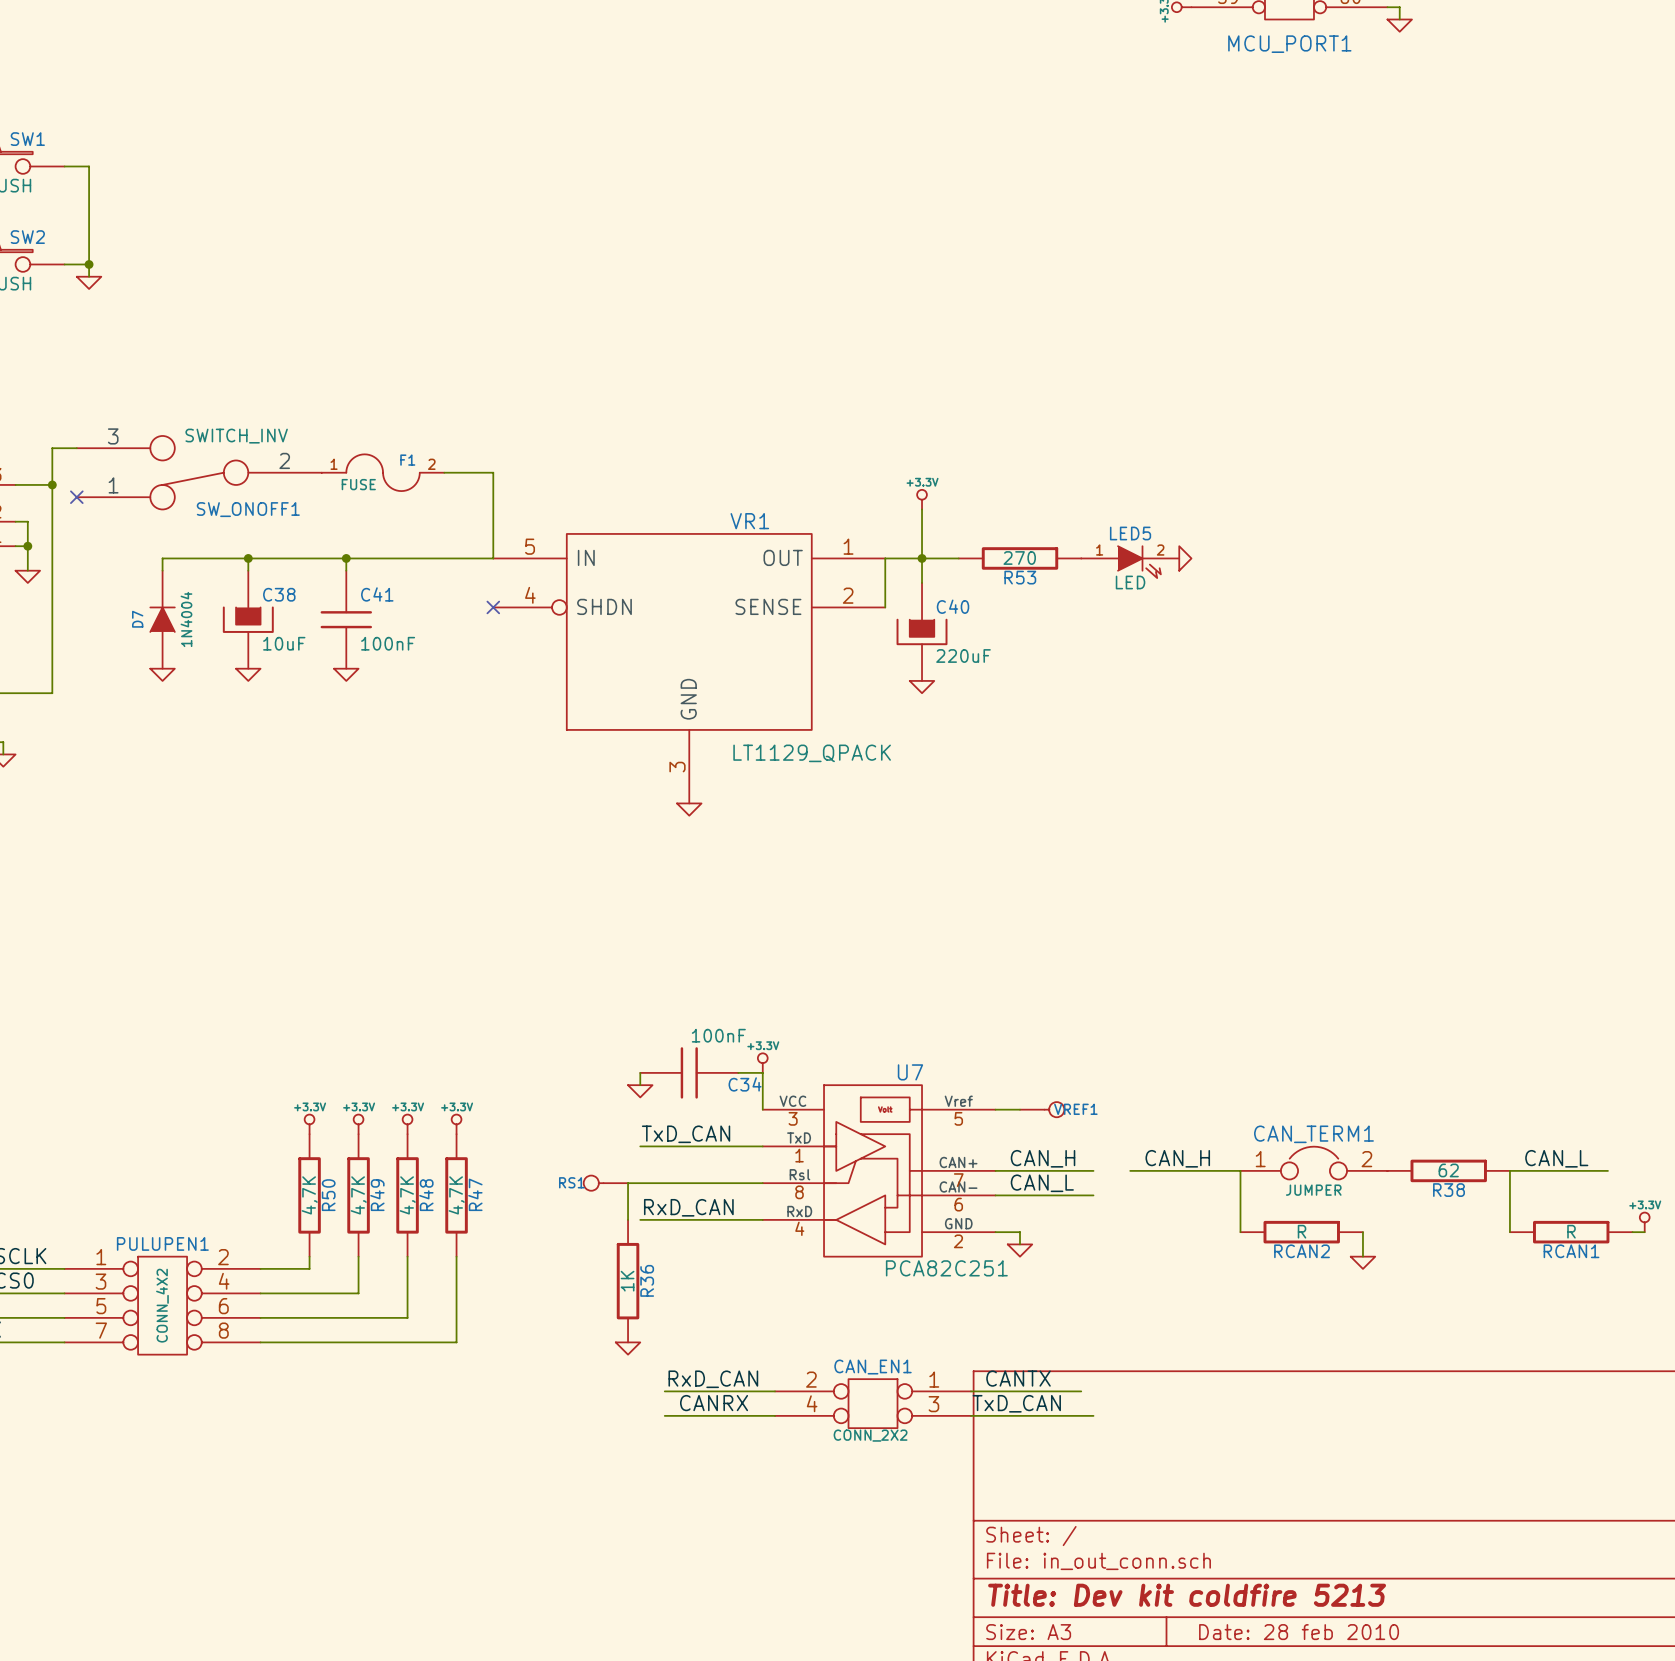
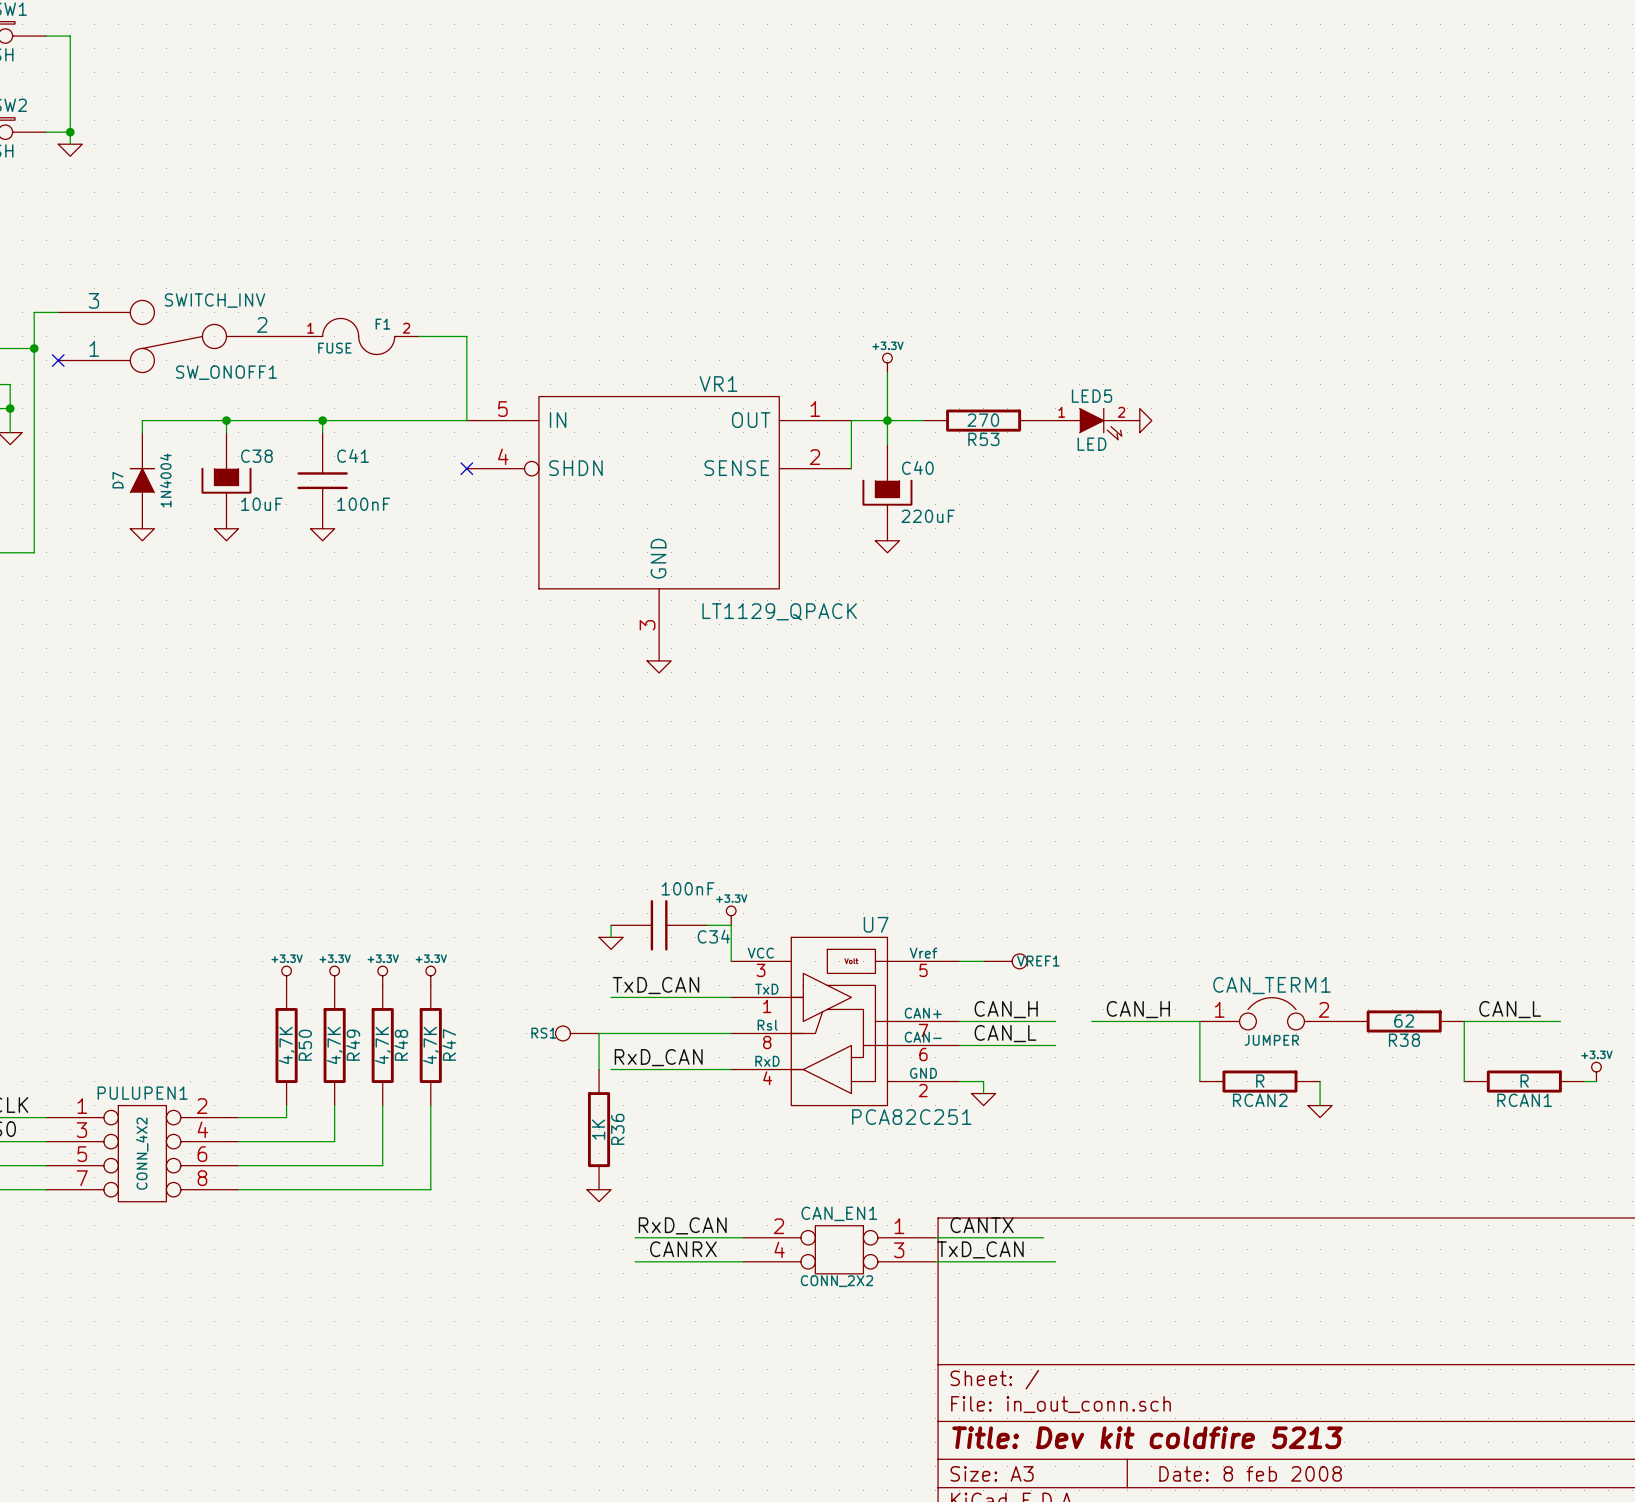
title block: Date: 28 feb 2010 (1299, 1632) -> Date: 8 feb 2008 (1250, 1473)

